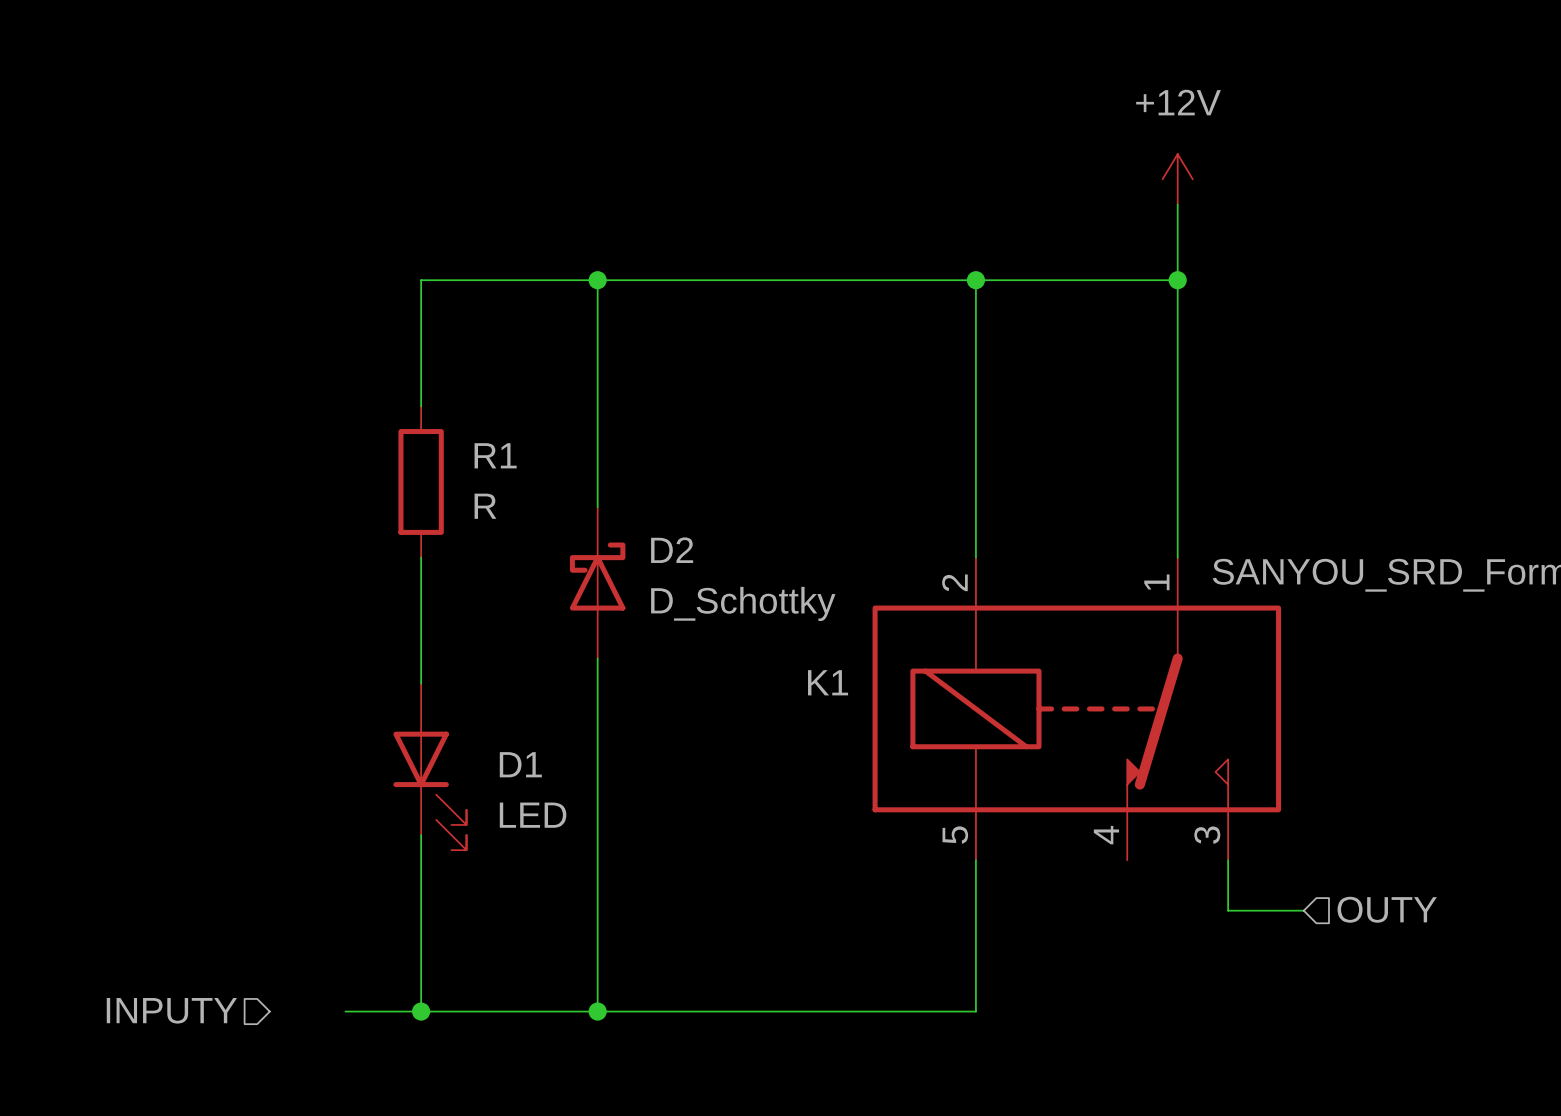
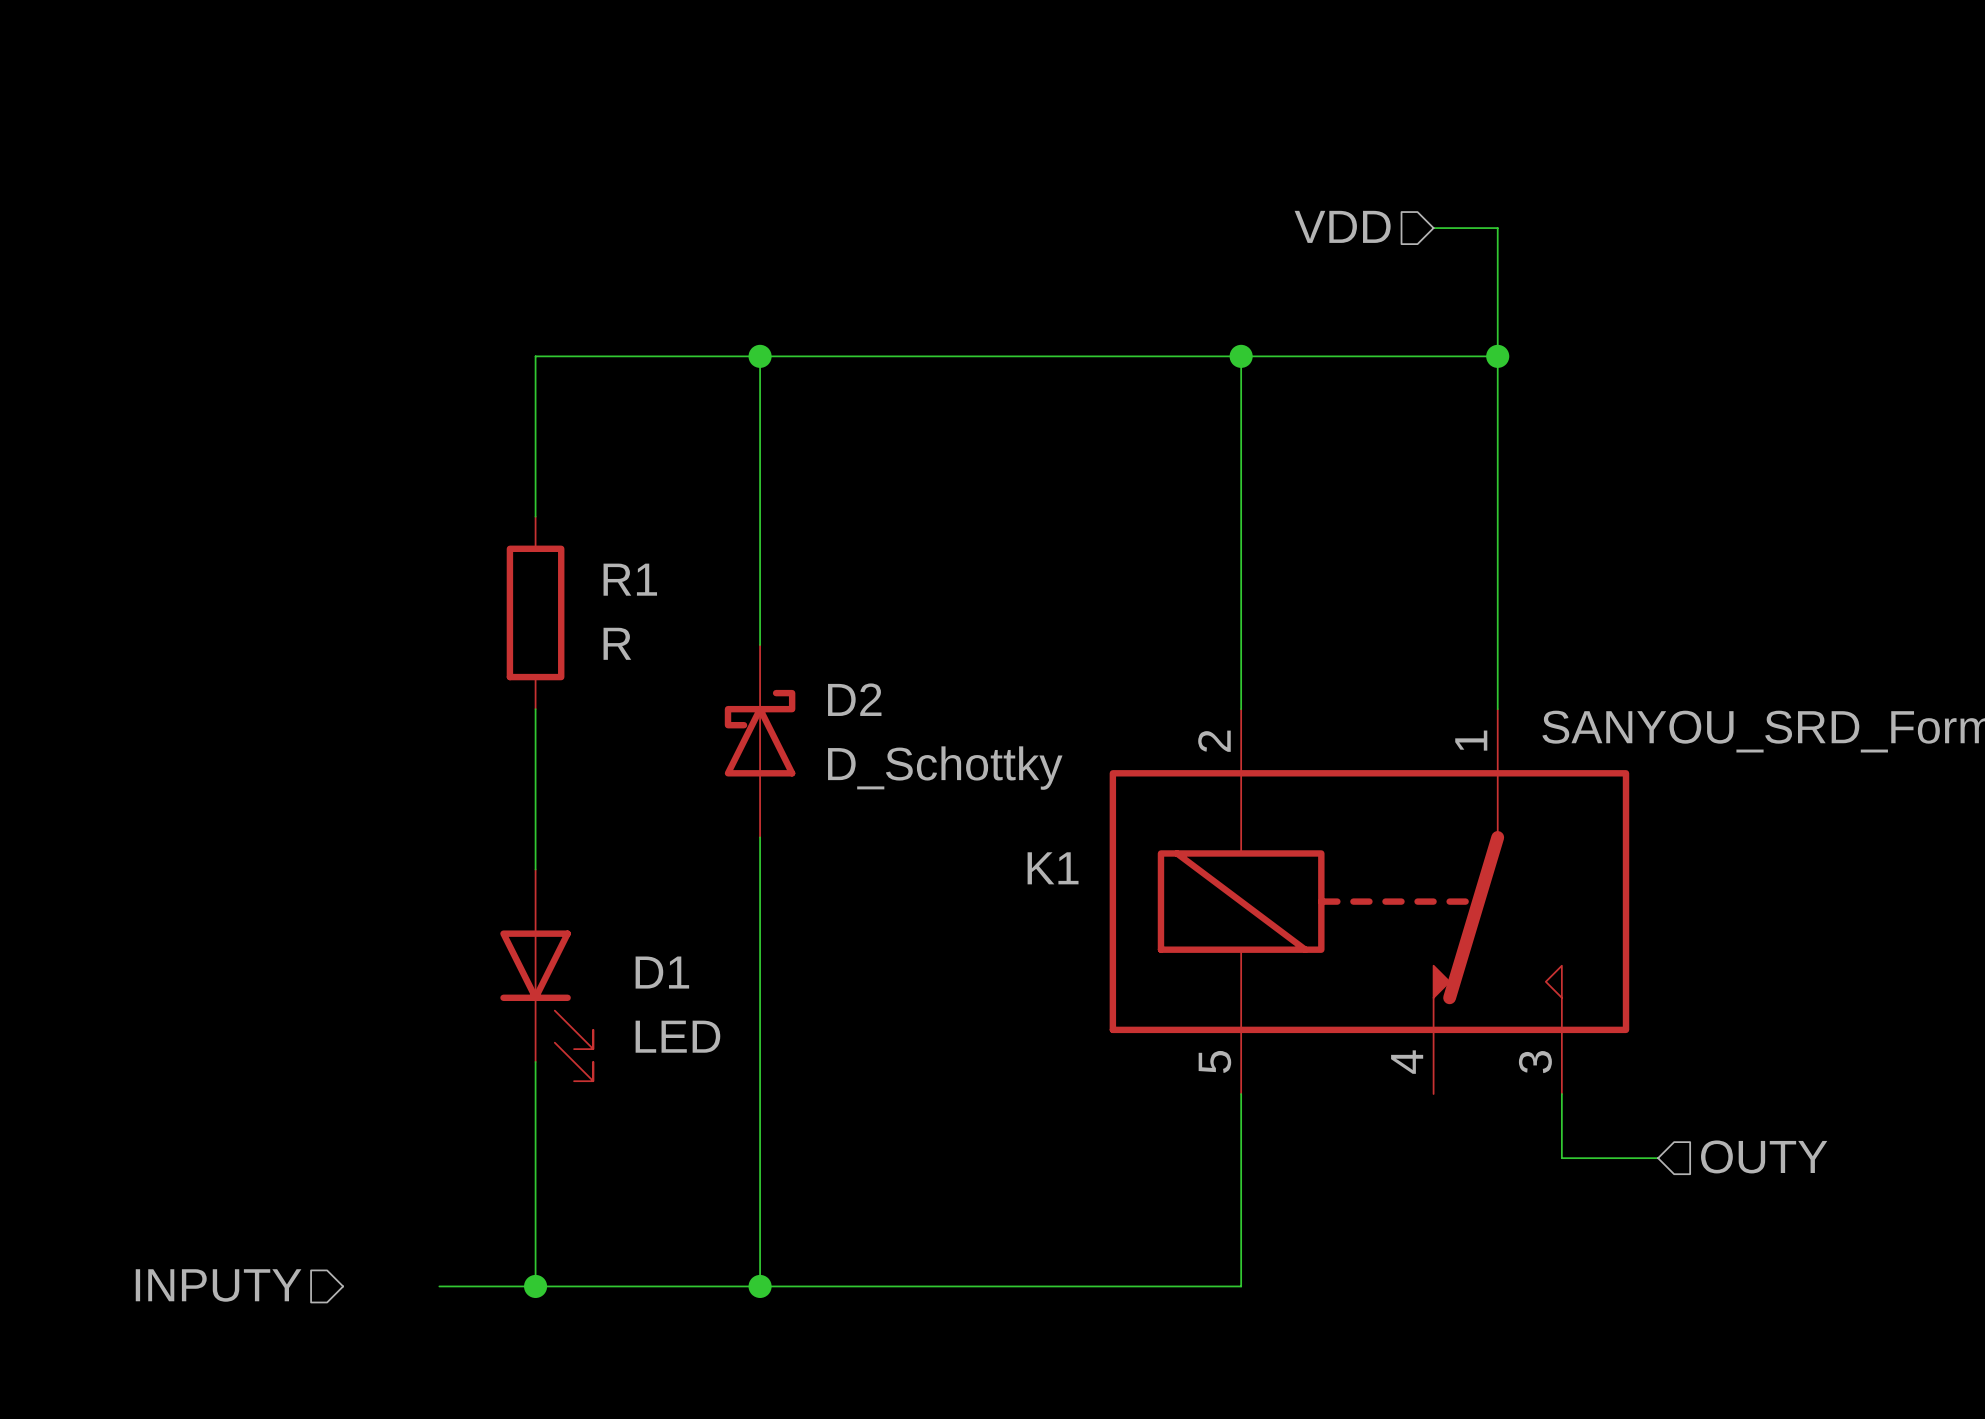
hierarchical label: none -> VDD (1342, 226)
wire: none -> (1433, 228) (1497, 228) (1497, 260)
power symbol: +12V (1177, 179) -> none

